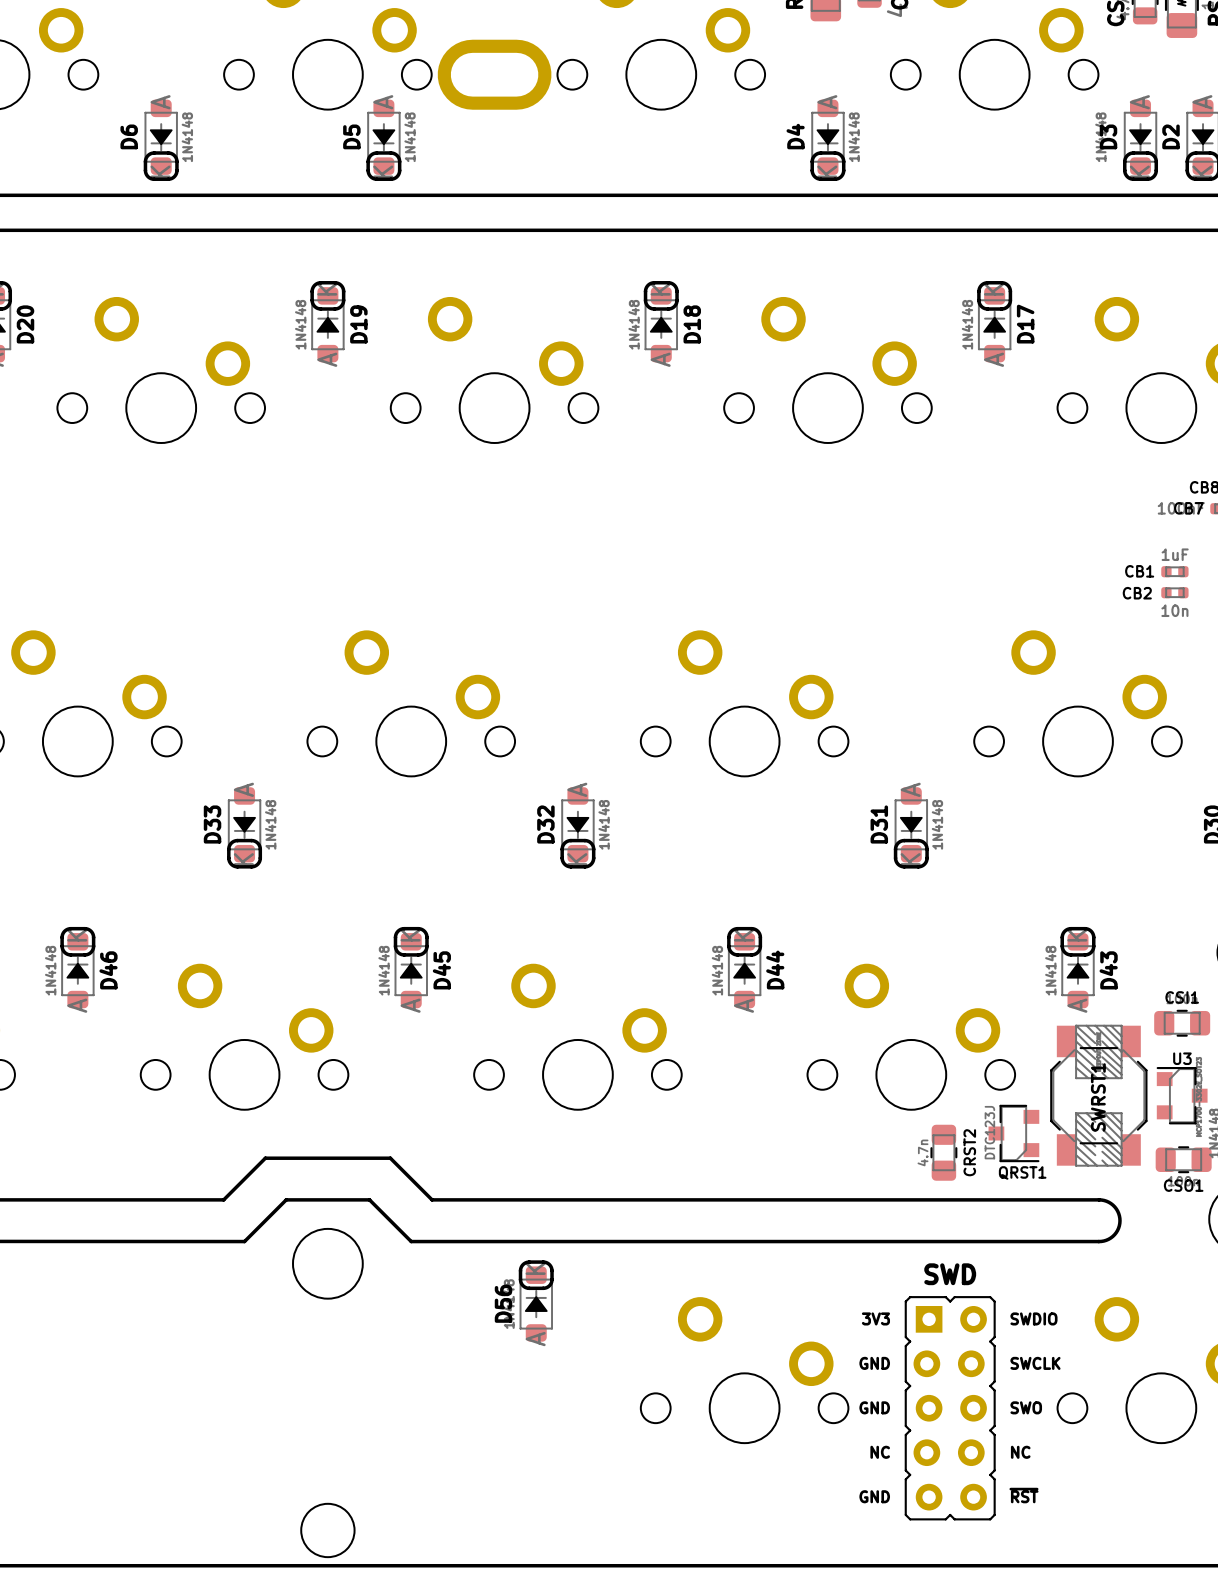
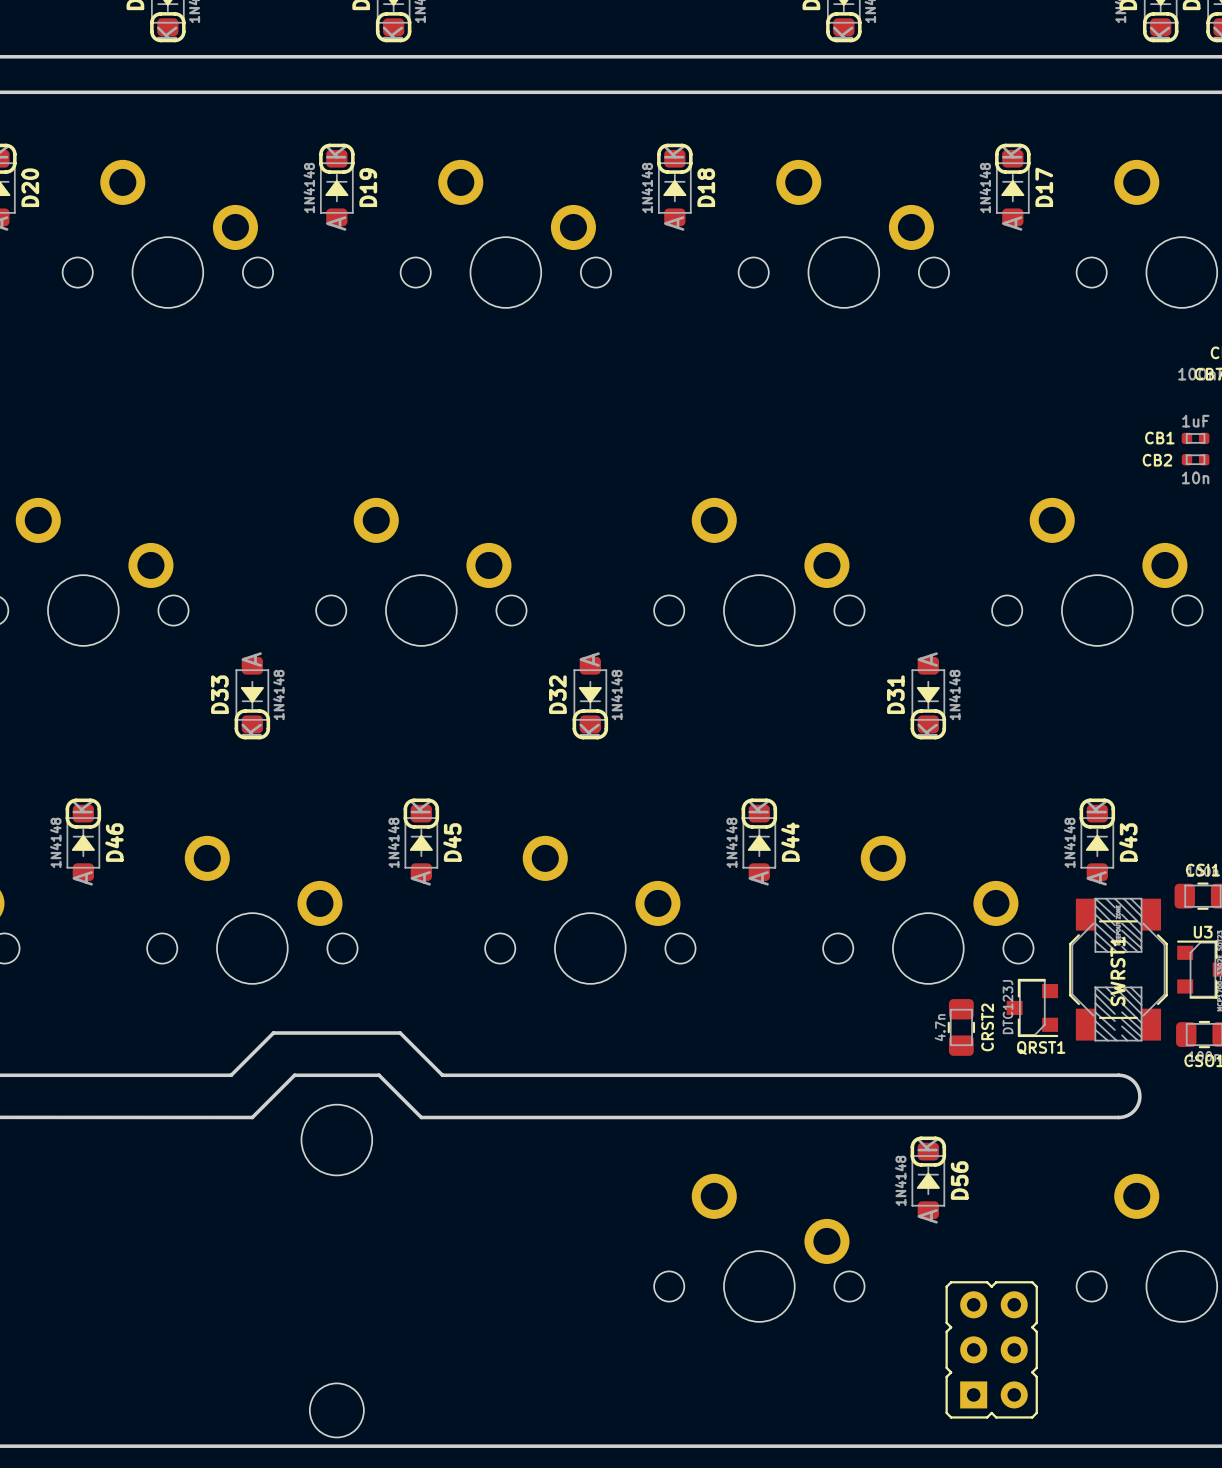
D56 position: (536, 1301) -> (928, 1177)
D56 name position: D56 (503, 1303) -> D56 (959, 1180)
part: (950, 1408) -> none
part: none -> (991, 1349)

